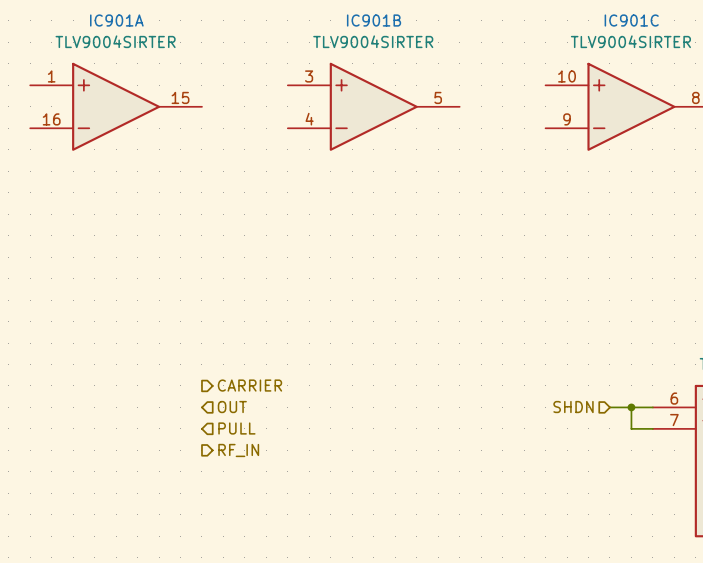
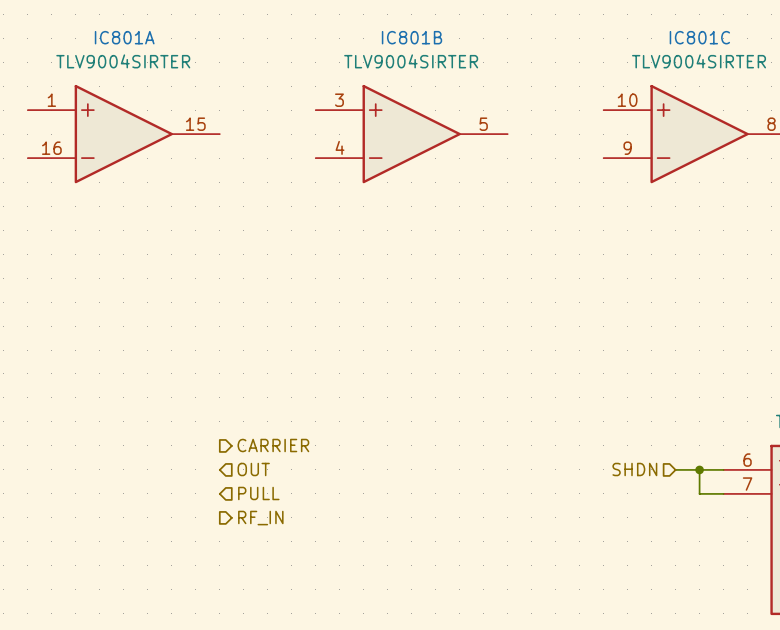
IC901A name: IC901A (116, 20) -> IC801A (124, 37)
IC901B name: IC901B (374, 20) -> IC801B (412, 37)
IC901C name: IC901C (631, 20) -> IC801C (699, 37)

